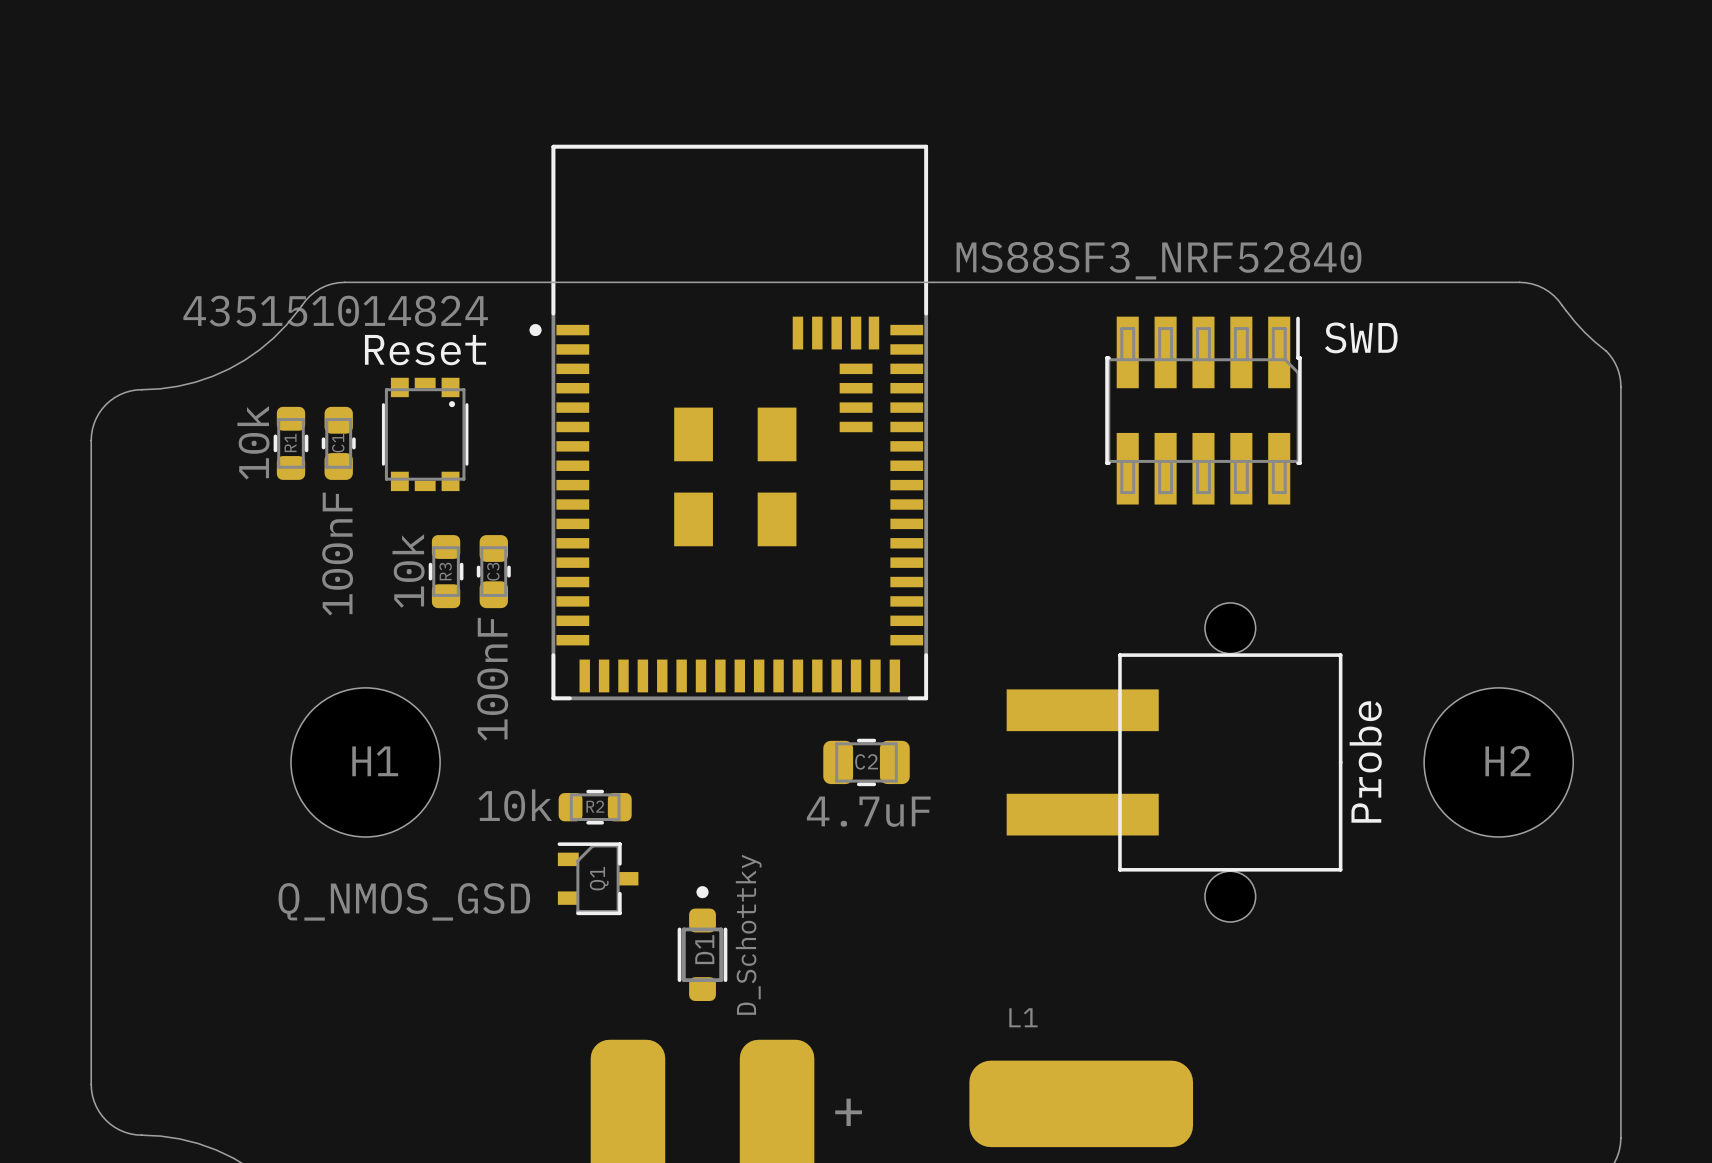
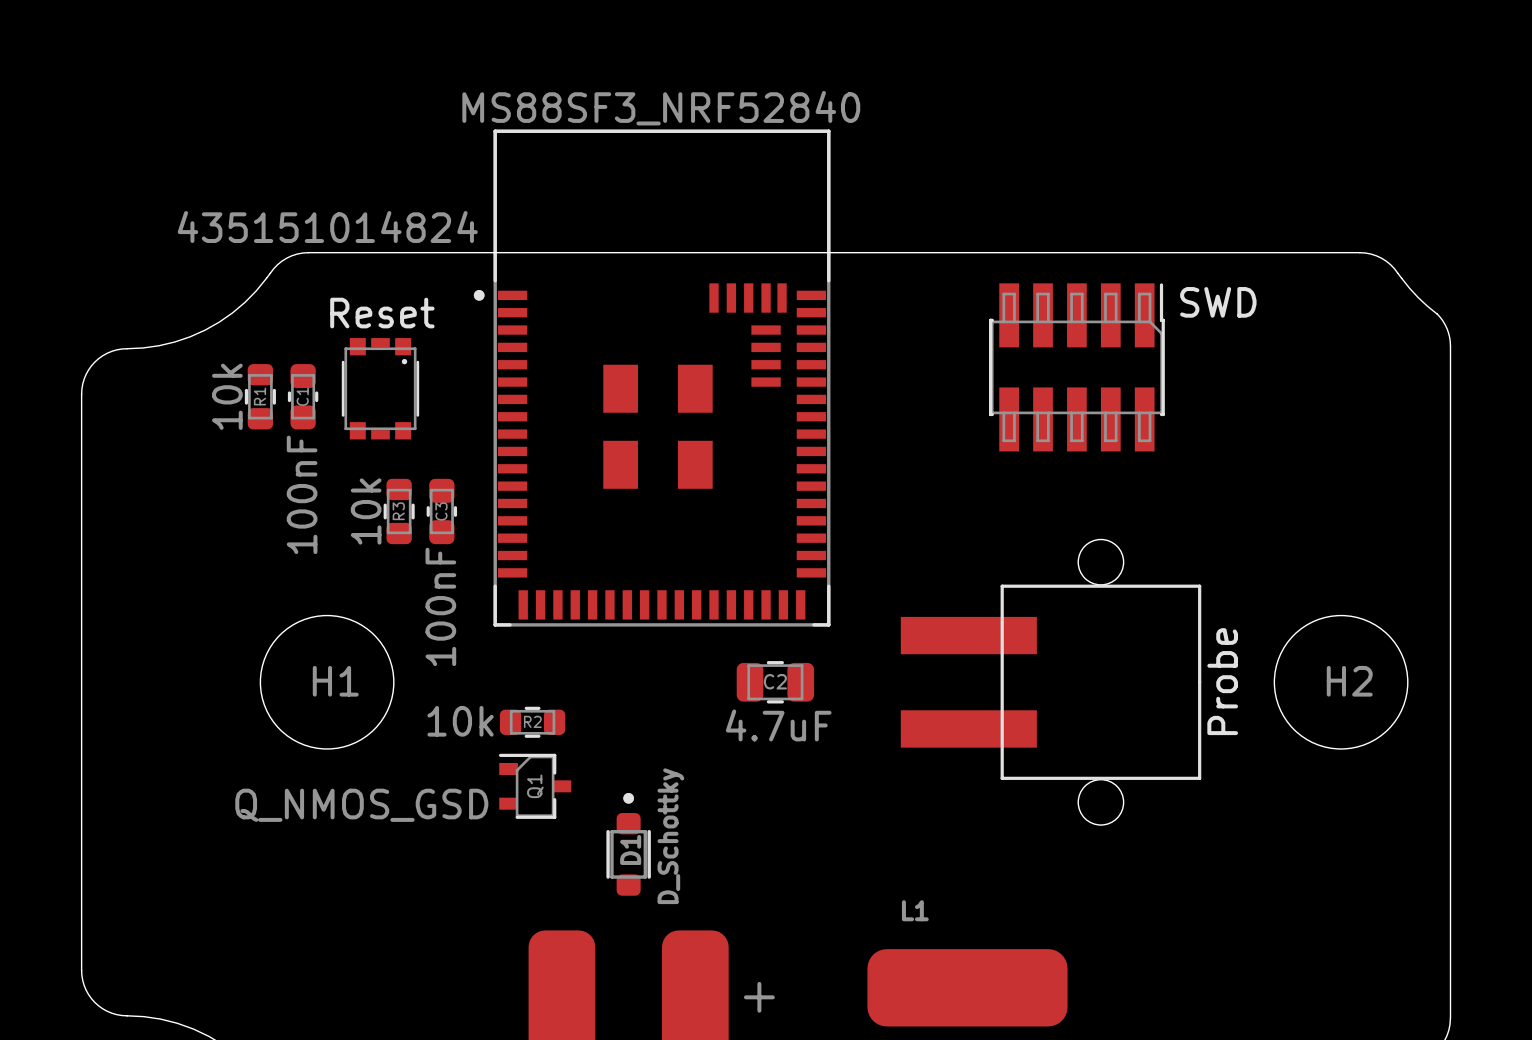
part value position: MS88SF3_NRF52840 (1159, 260) -> MS88SF3_NRF52840 (661, 108)
part value position: 435151014824 (335, 311) -> 435151014824 (327, 227)

